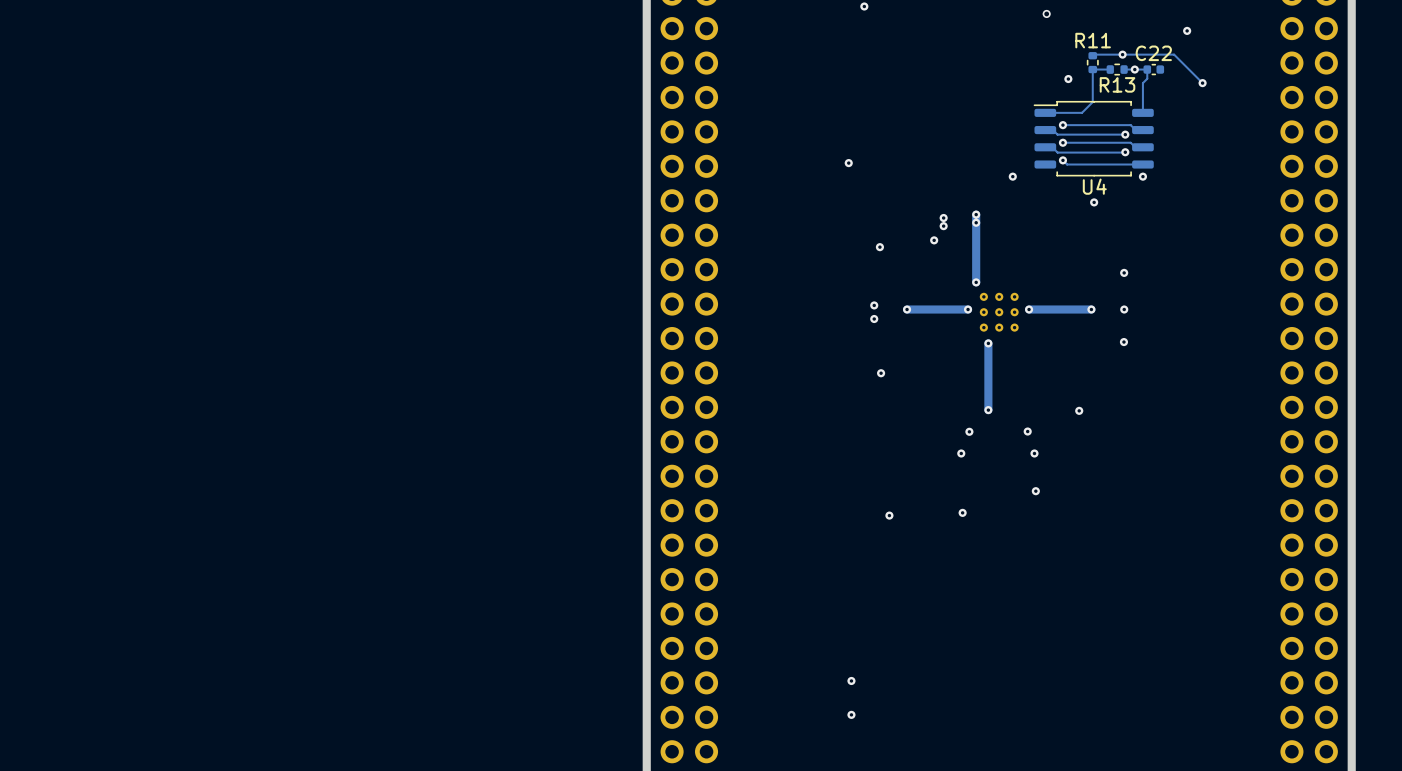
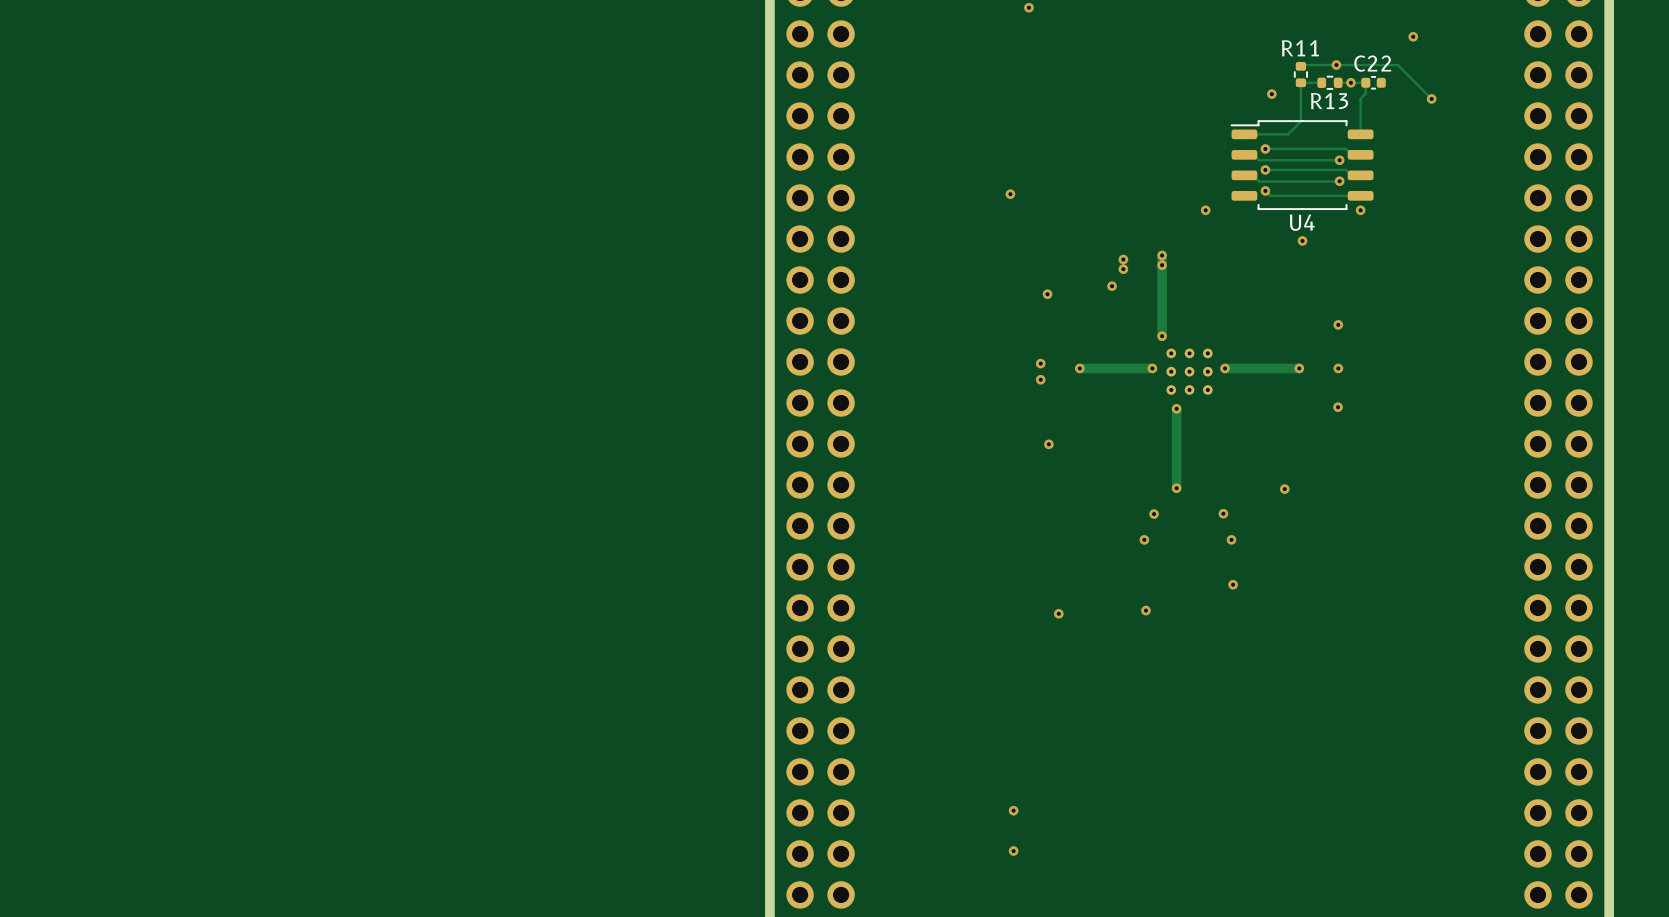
via: (1046, 13) -> none

